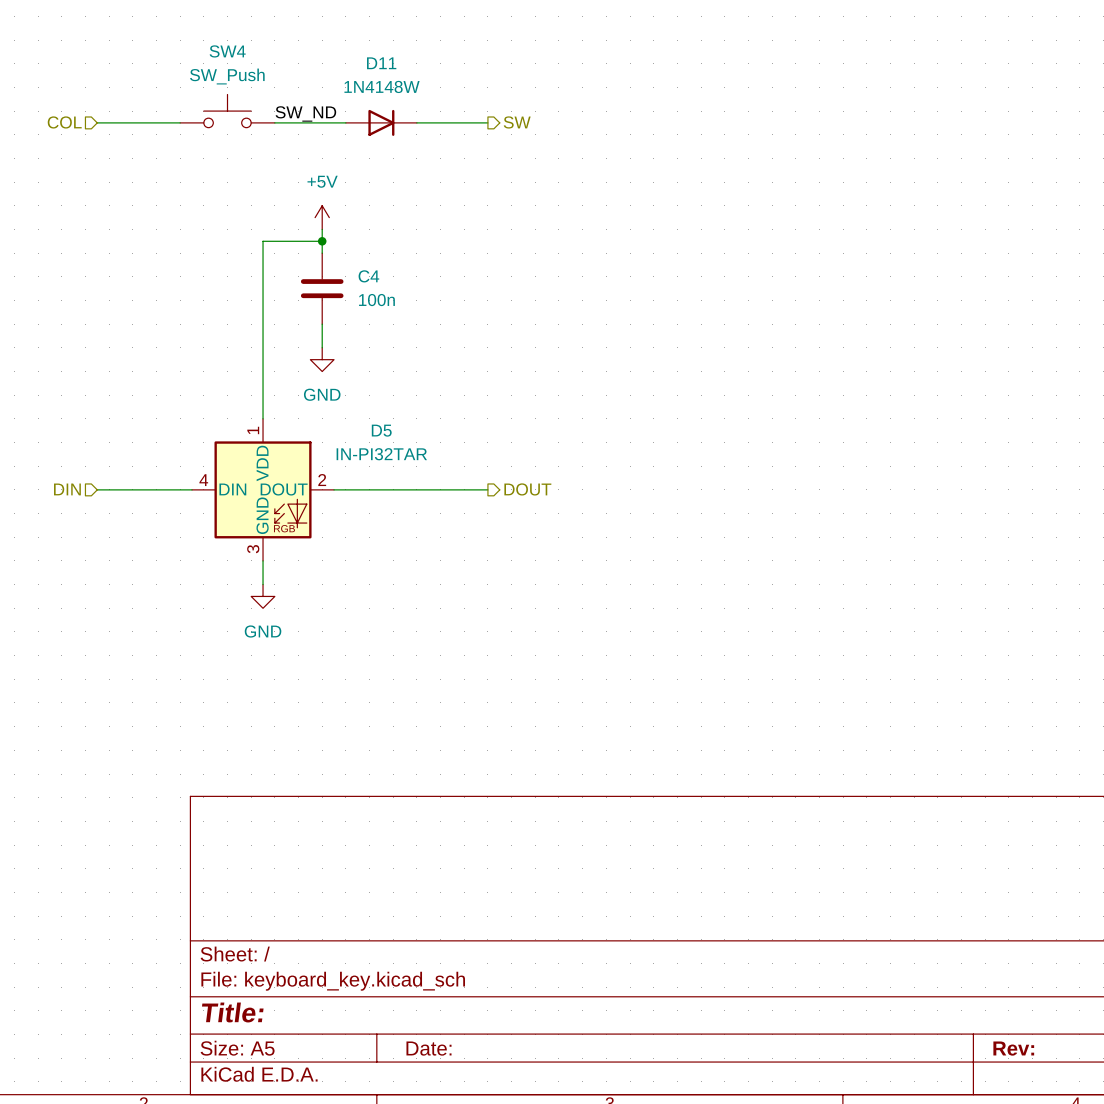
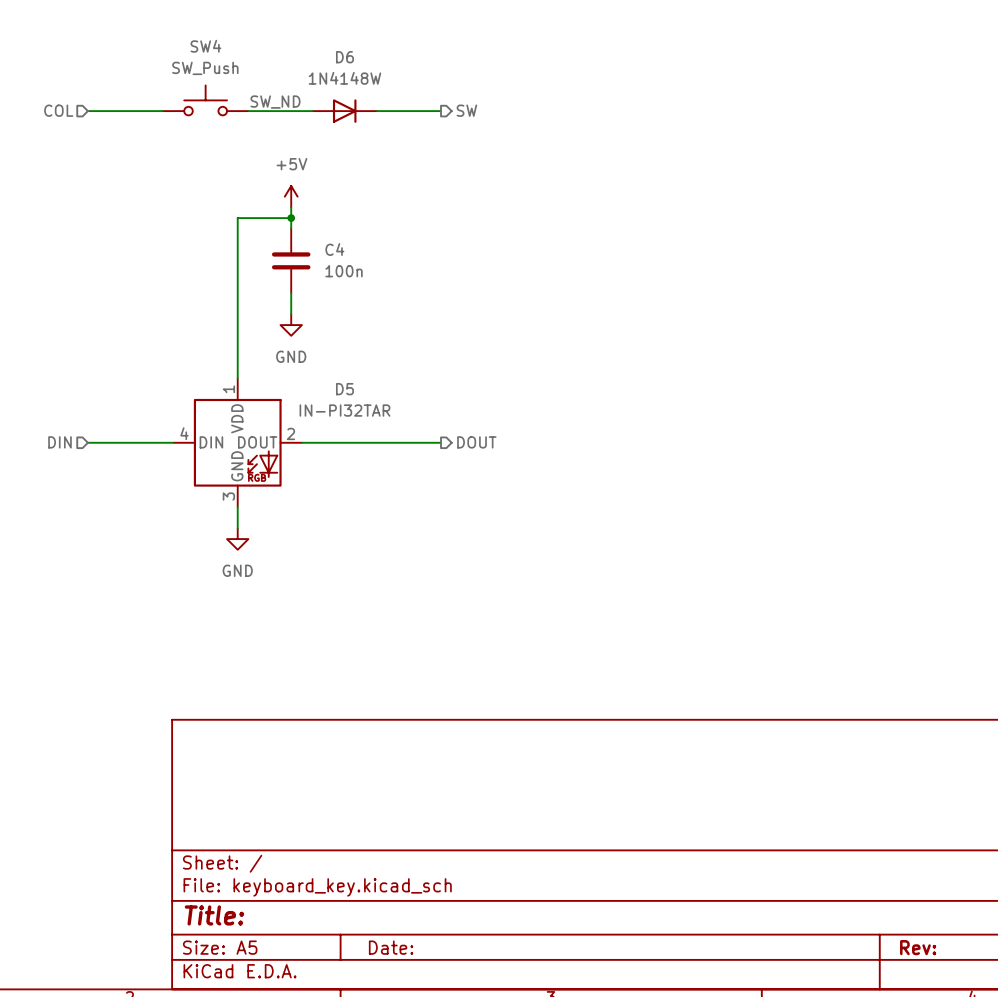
D11 name: D11 (381, 63) -> D6 (344, 57)

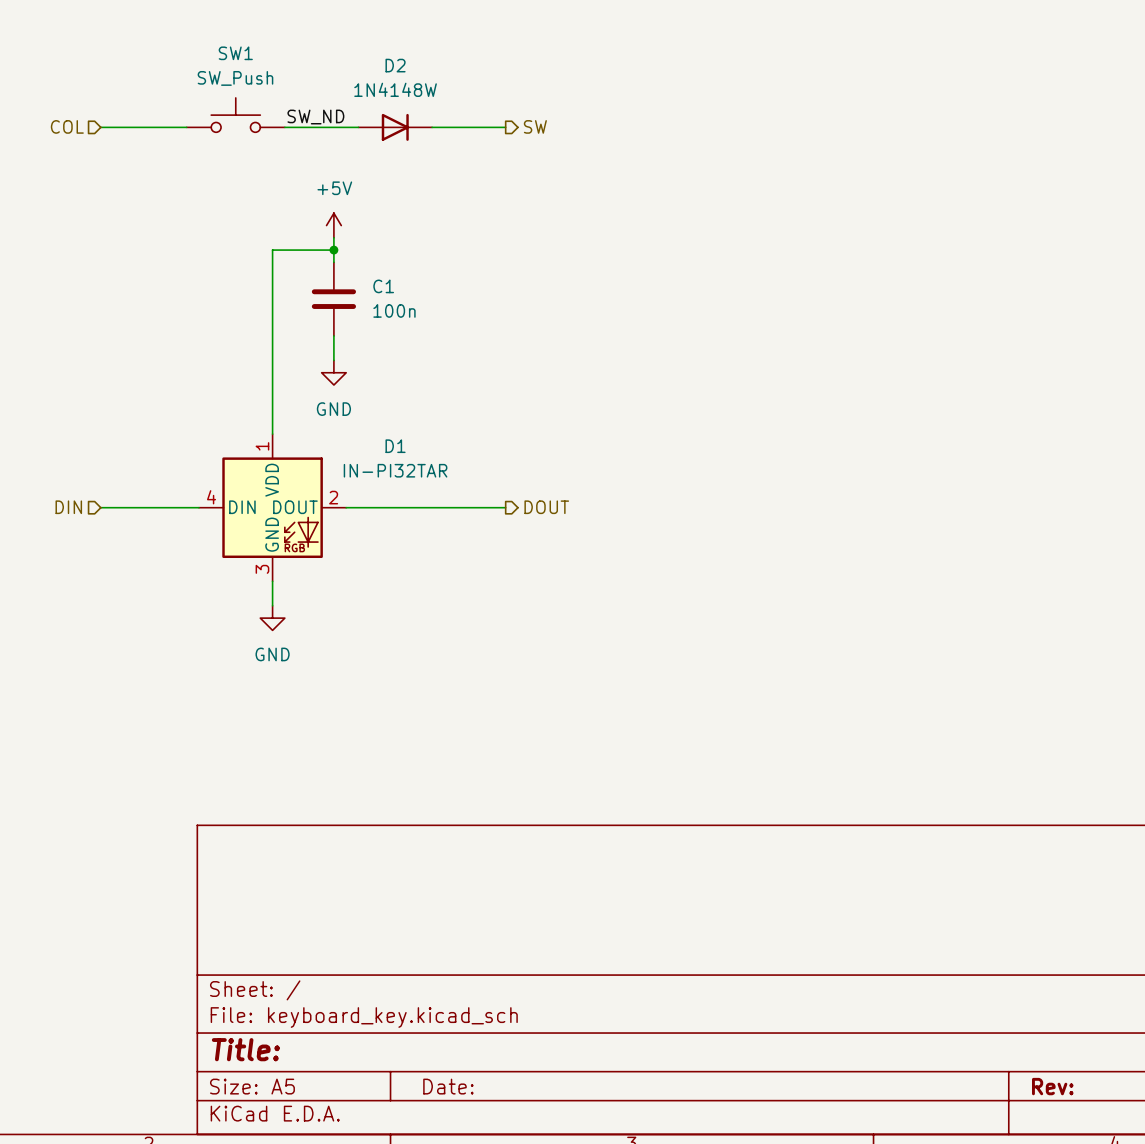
SW4 name: SW4 (205, 46) -> SW1 (235, 53)
D6 name: D6 (344, 57) -> D2 (395, 65)
C4 name: C4 (334, 249) -> C1 (383, 286)
D5 name: D5 (344, 389) -> D1 (395, 446)

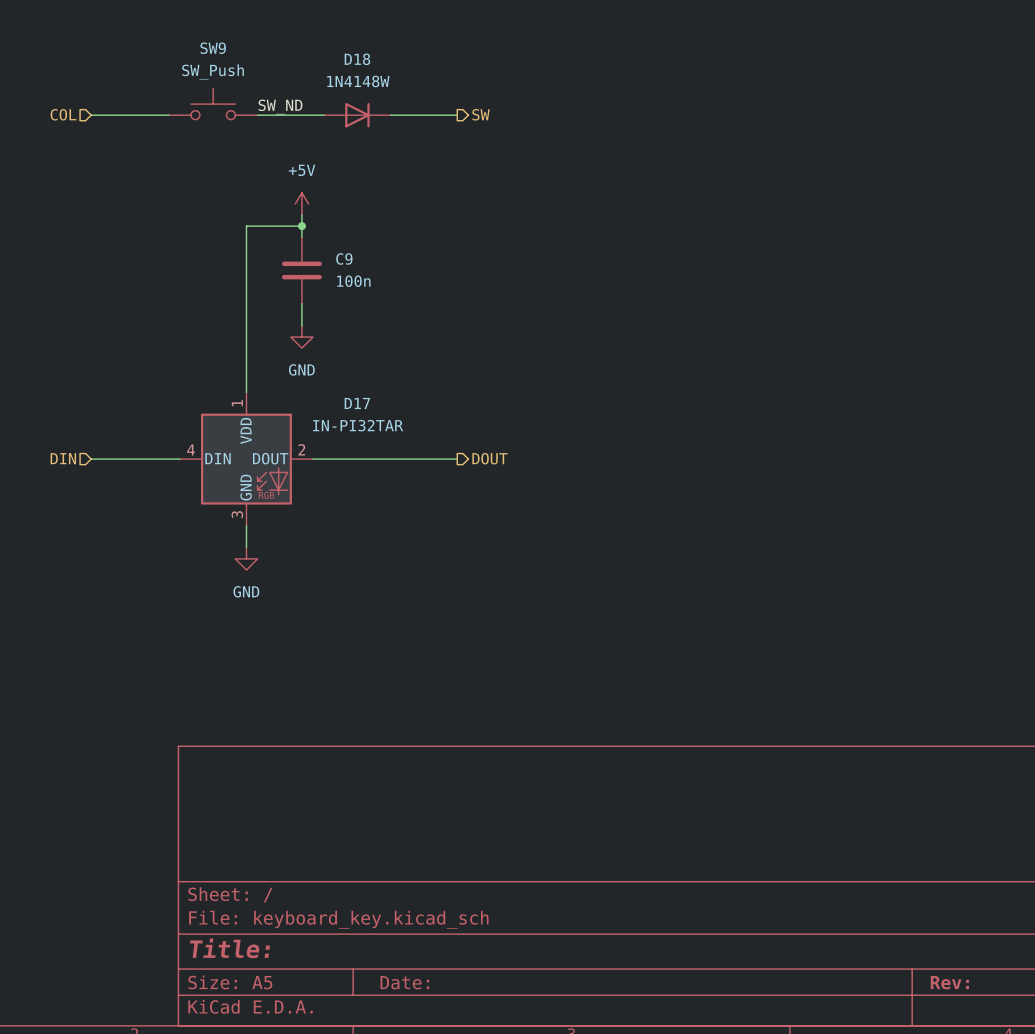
SW1 name: SW1 (235, 53) -> SW9 (213, 48)
D2 name: D2 (395, 65) -> D18 (357, 59)
C1 name: C1 (383, 286) -> C9 (344, 258)
D1 name: D1 (395, 446) -> D17 (357, 403)

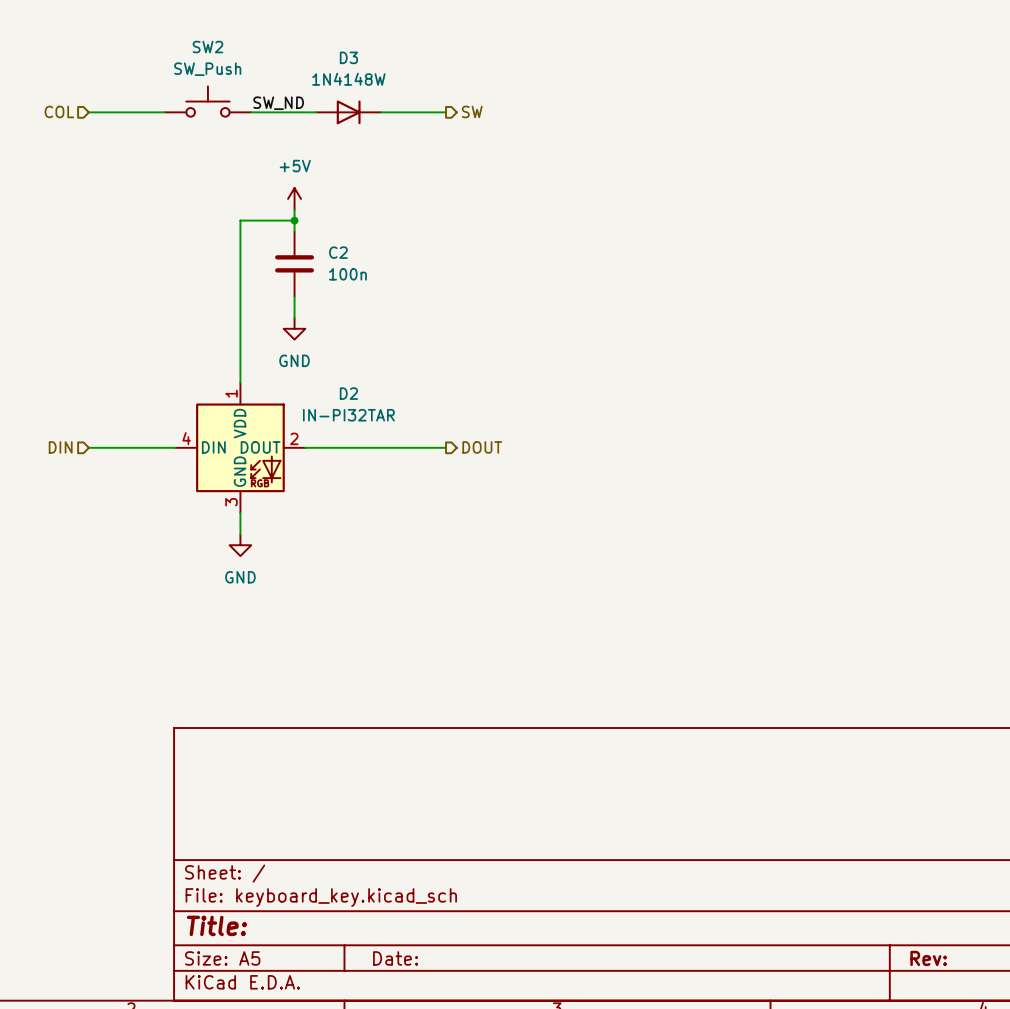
SW9 name: SW9 (213, 48) -> SW2 (207, 47)
D18 name: D18 (357, 59) -> D3 (348, 57)
C9 name: C9 (344, 258) -> C2 (338, 252)
D17 name: D17 (357, 403) -> D2 (348, 393)

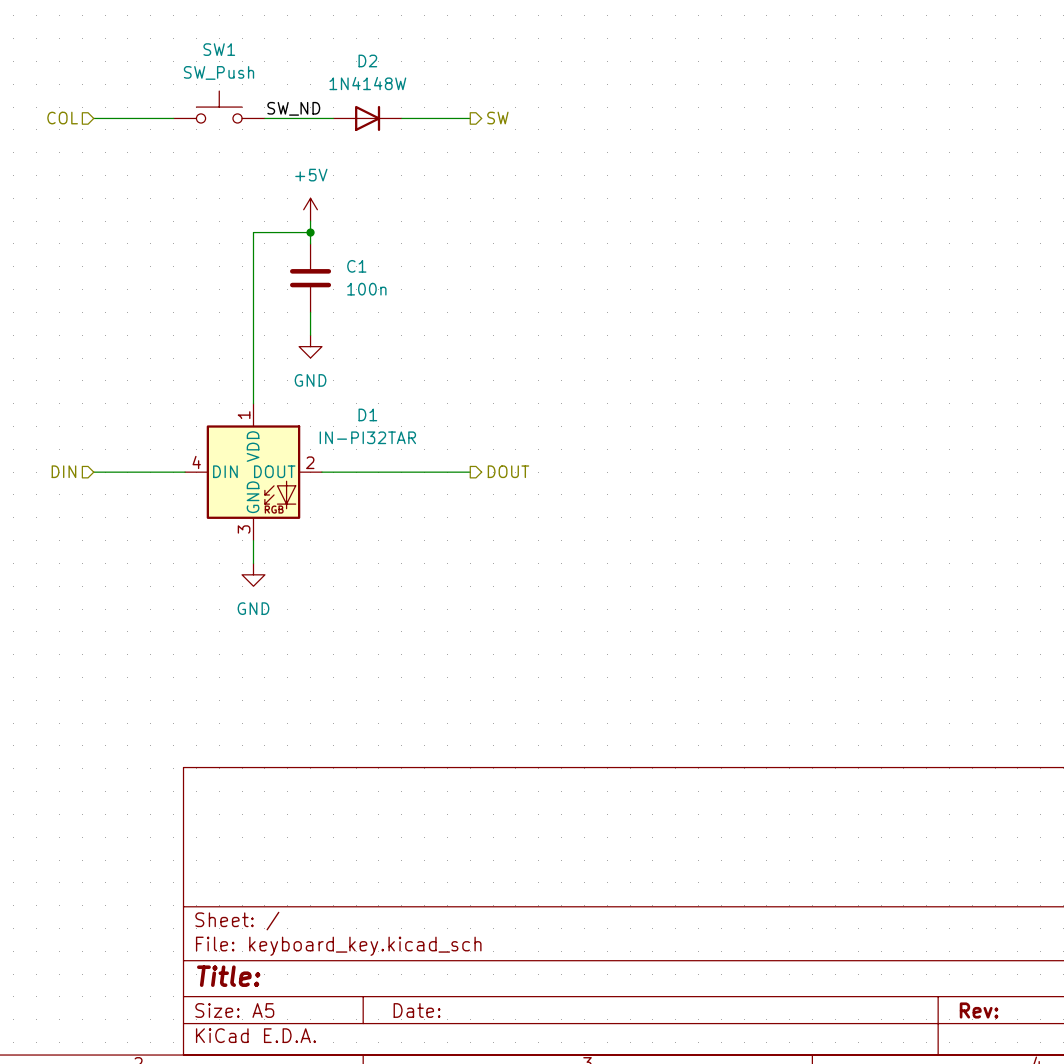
SW2 name: SW2 (207, 47) -> SW1 (219, 49)
D3 name: D3 (348, 57) -> D2 (367, 60)
C2 name: C2 (338, 252) -> C1 (356, 266)
D2 name: D2 (348, 393) -> D1 (367, 414)

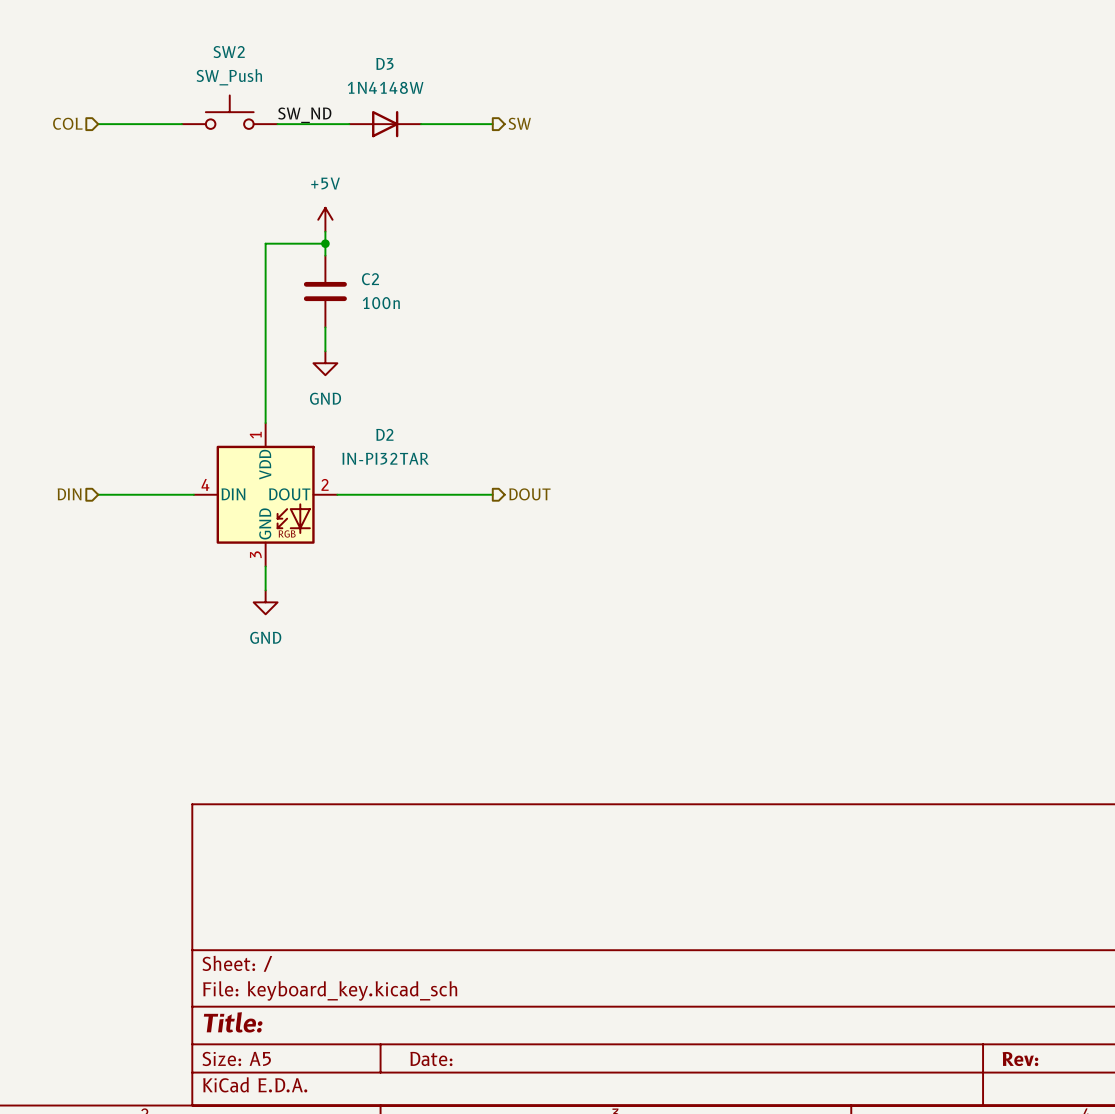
SW1 name: SW1 (219, 49) -> SW2 (229, 52)
D2 name: D2 (367, 60) -> D3 (384, 63)
C1 name: C1 (356, 266) -> C2 (370, 279)
D1 name: D1 (367, 414) -> D2 (384, 434)

